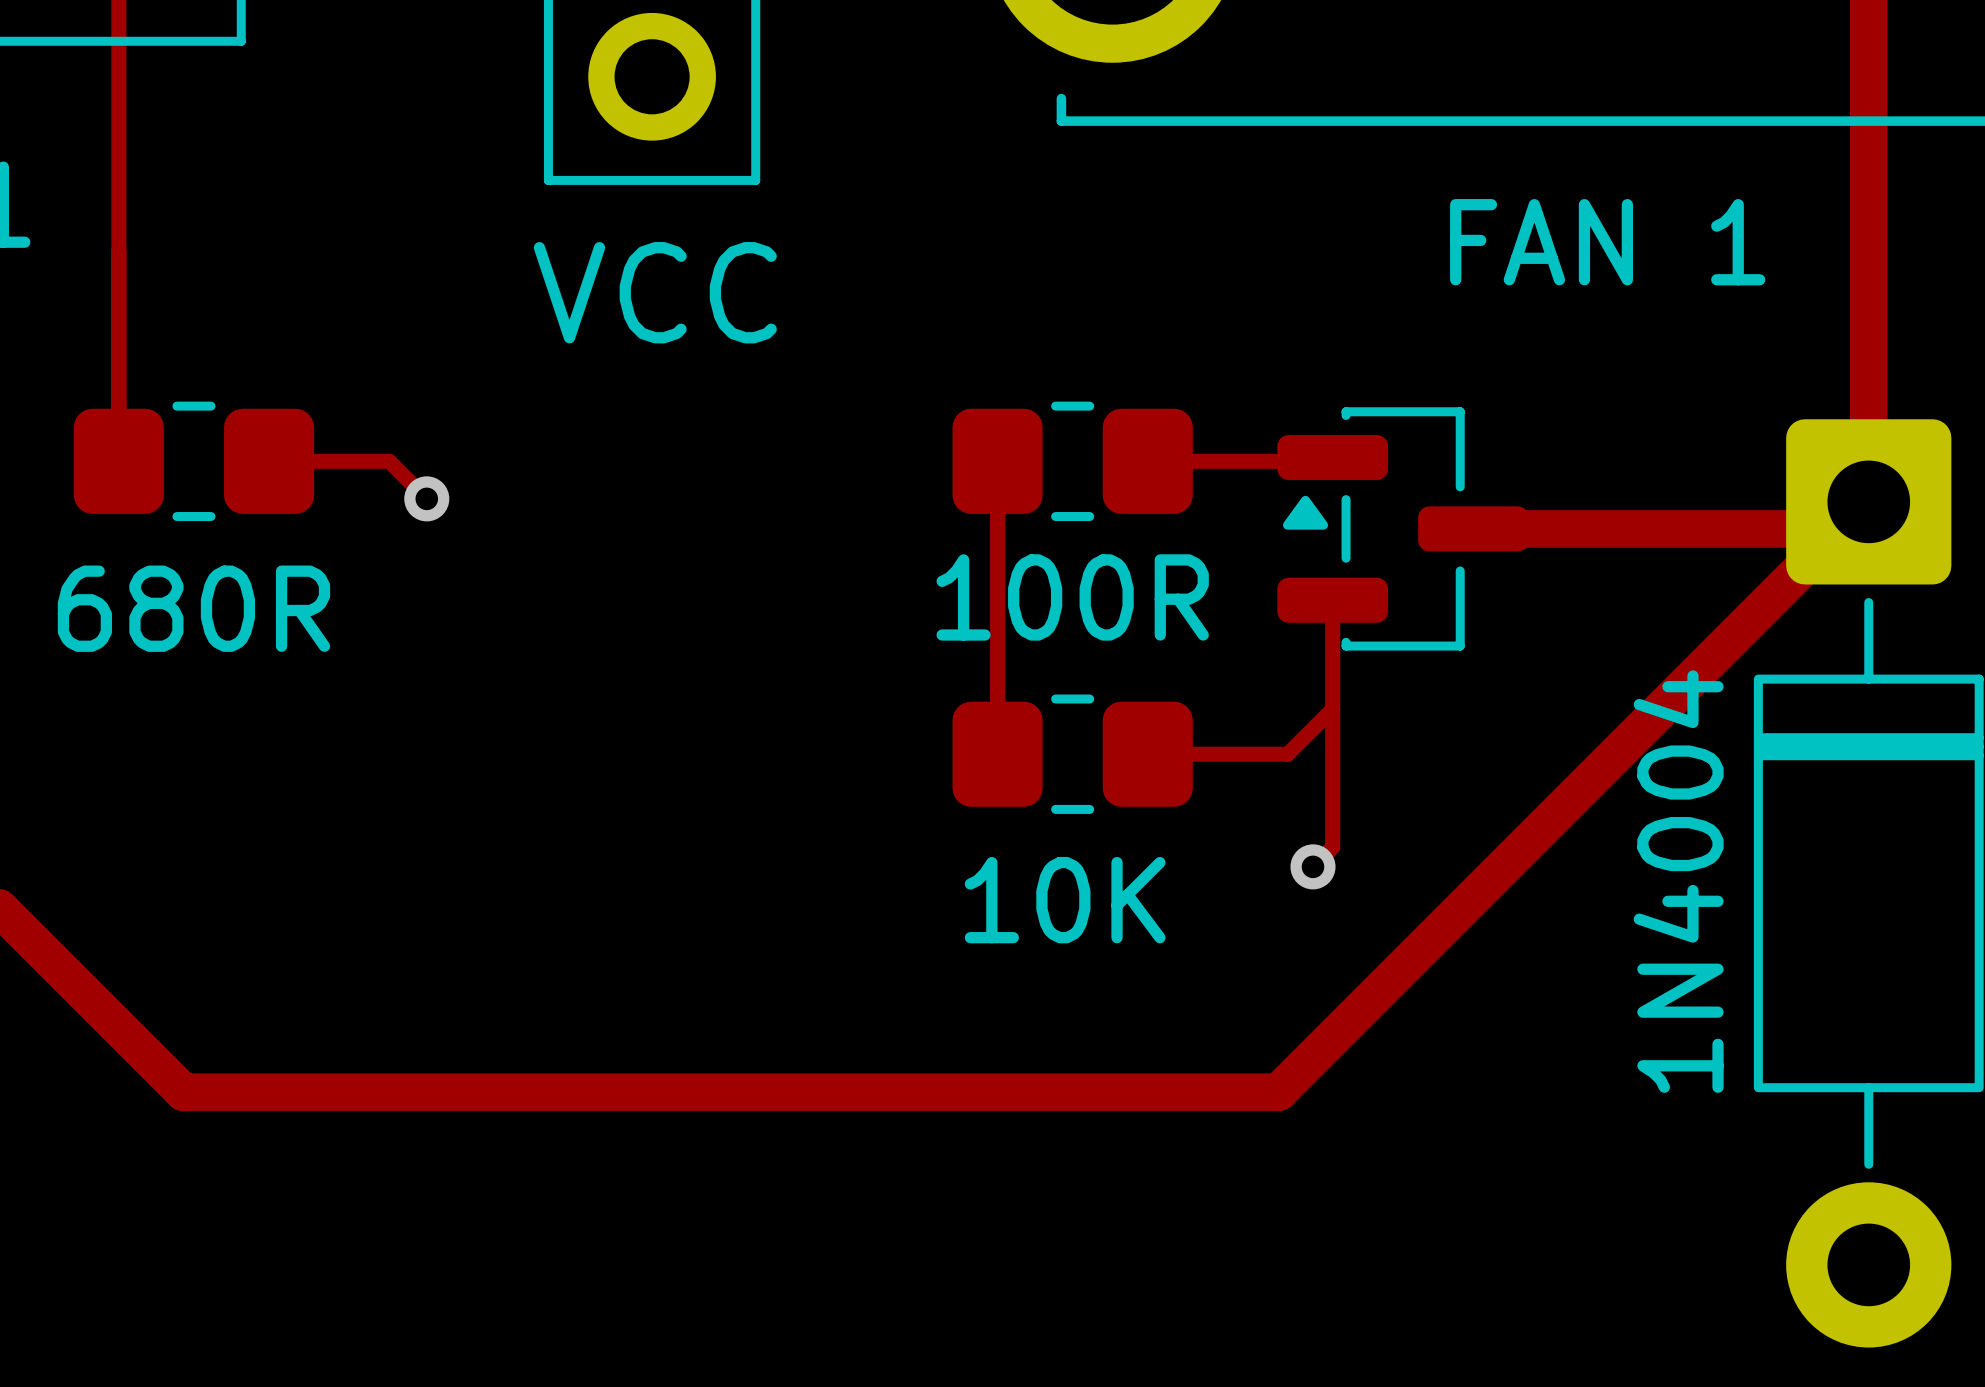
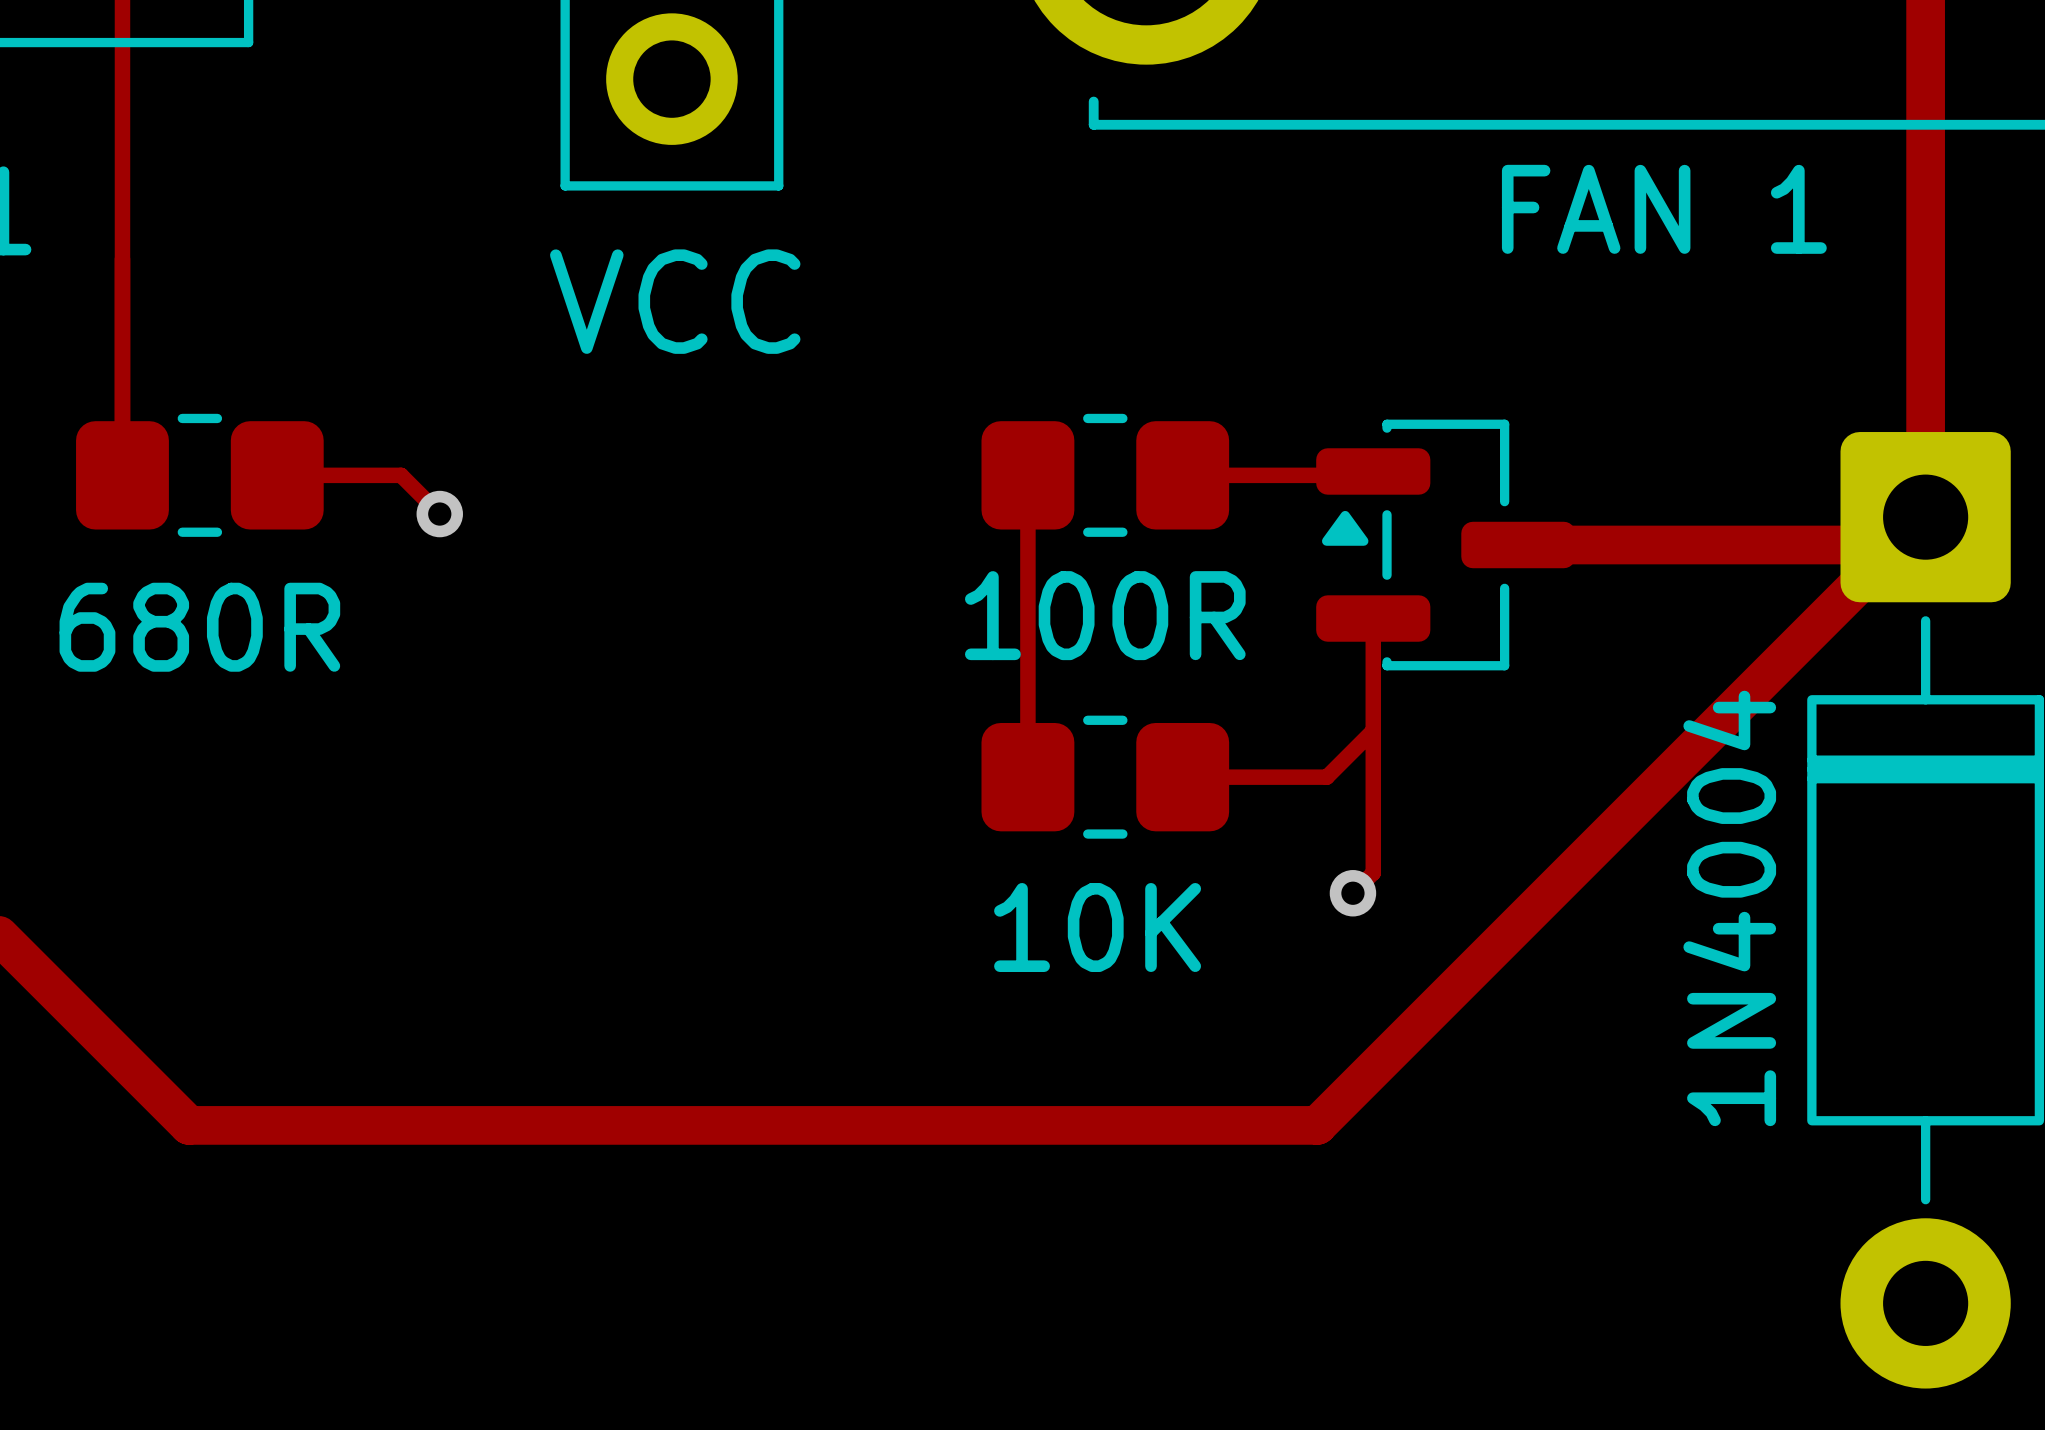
part value position: FAN 1 (1607, 242) -> FAN 1 (1664, 209)

